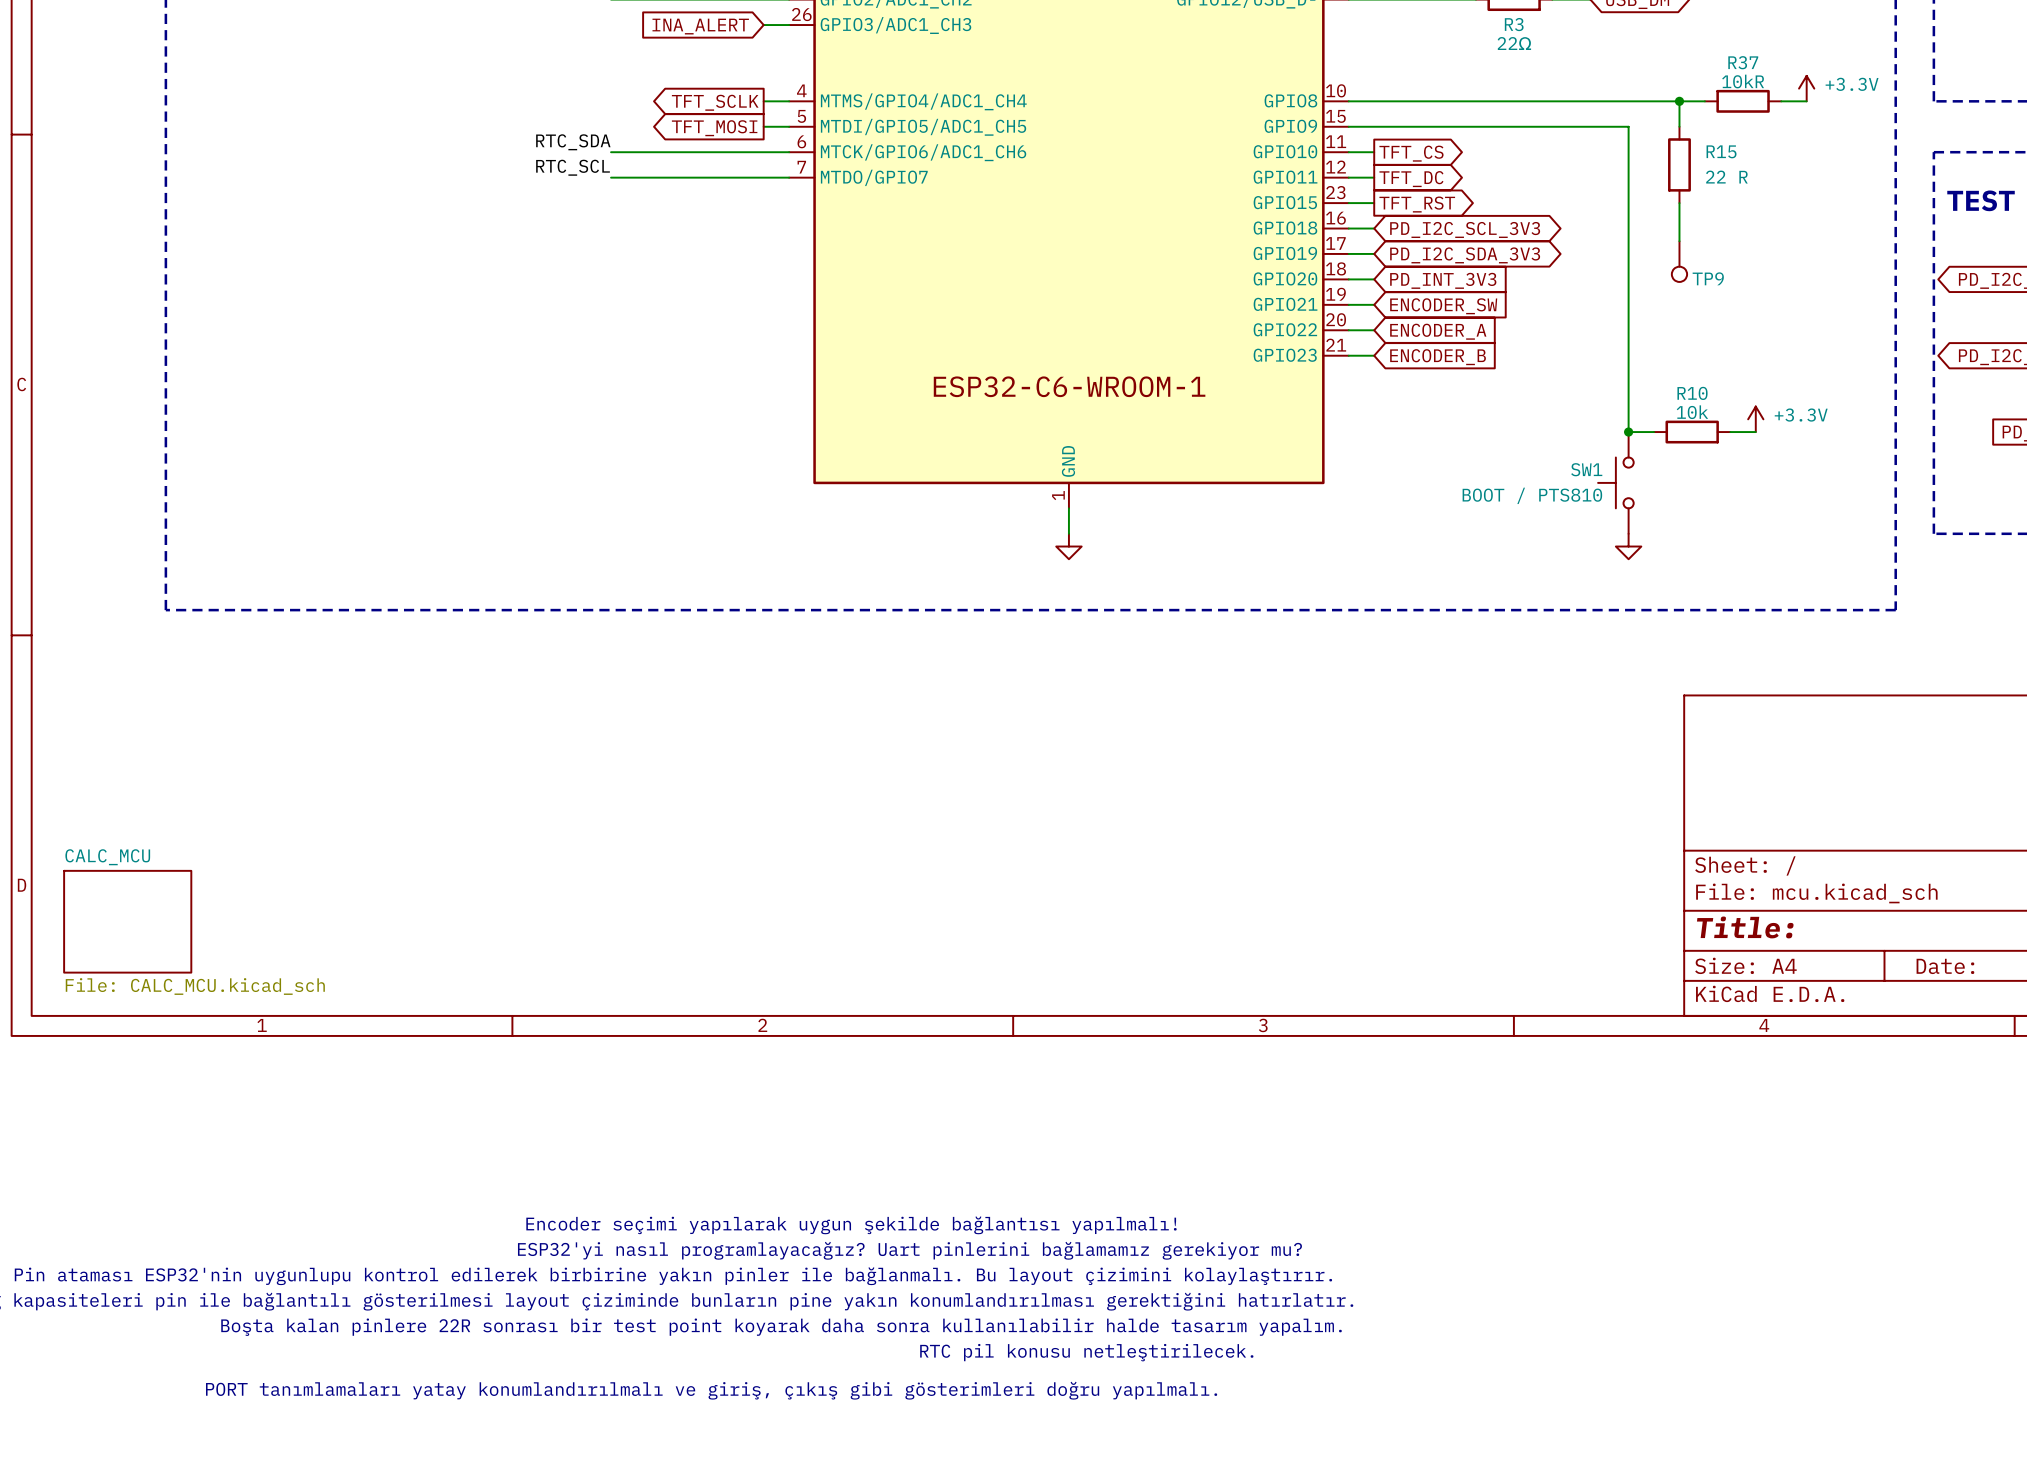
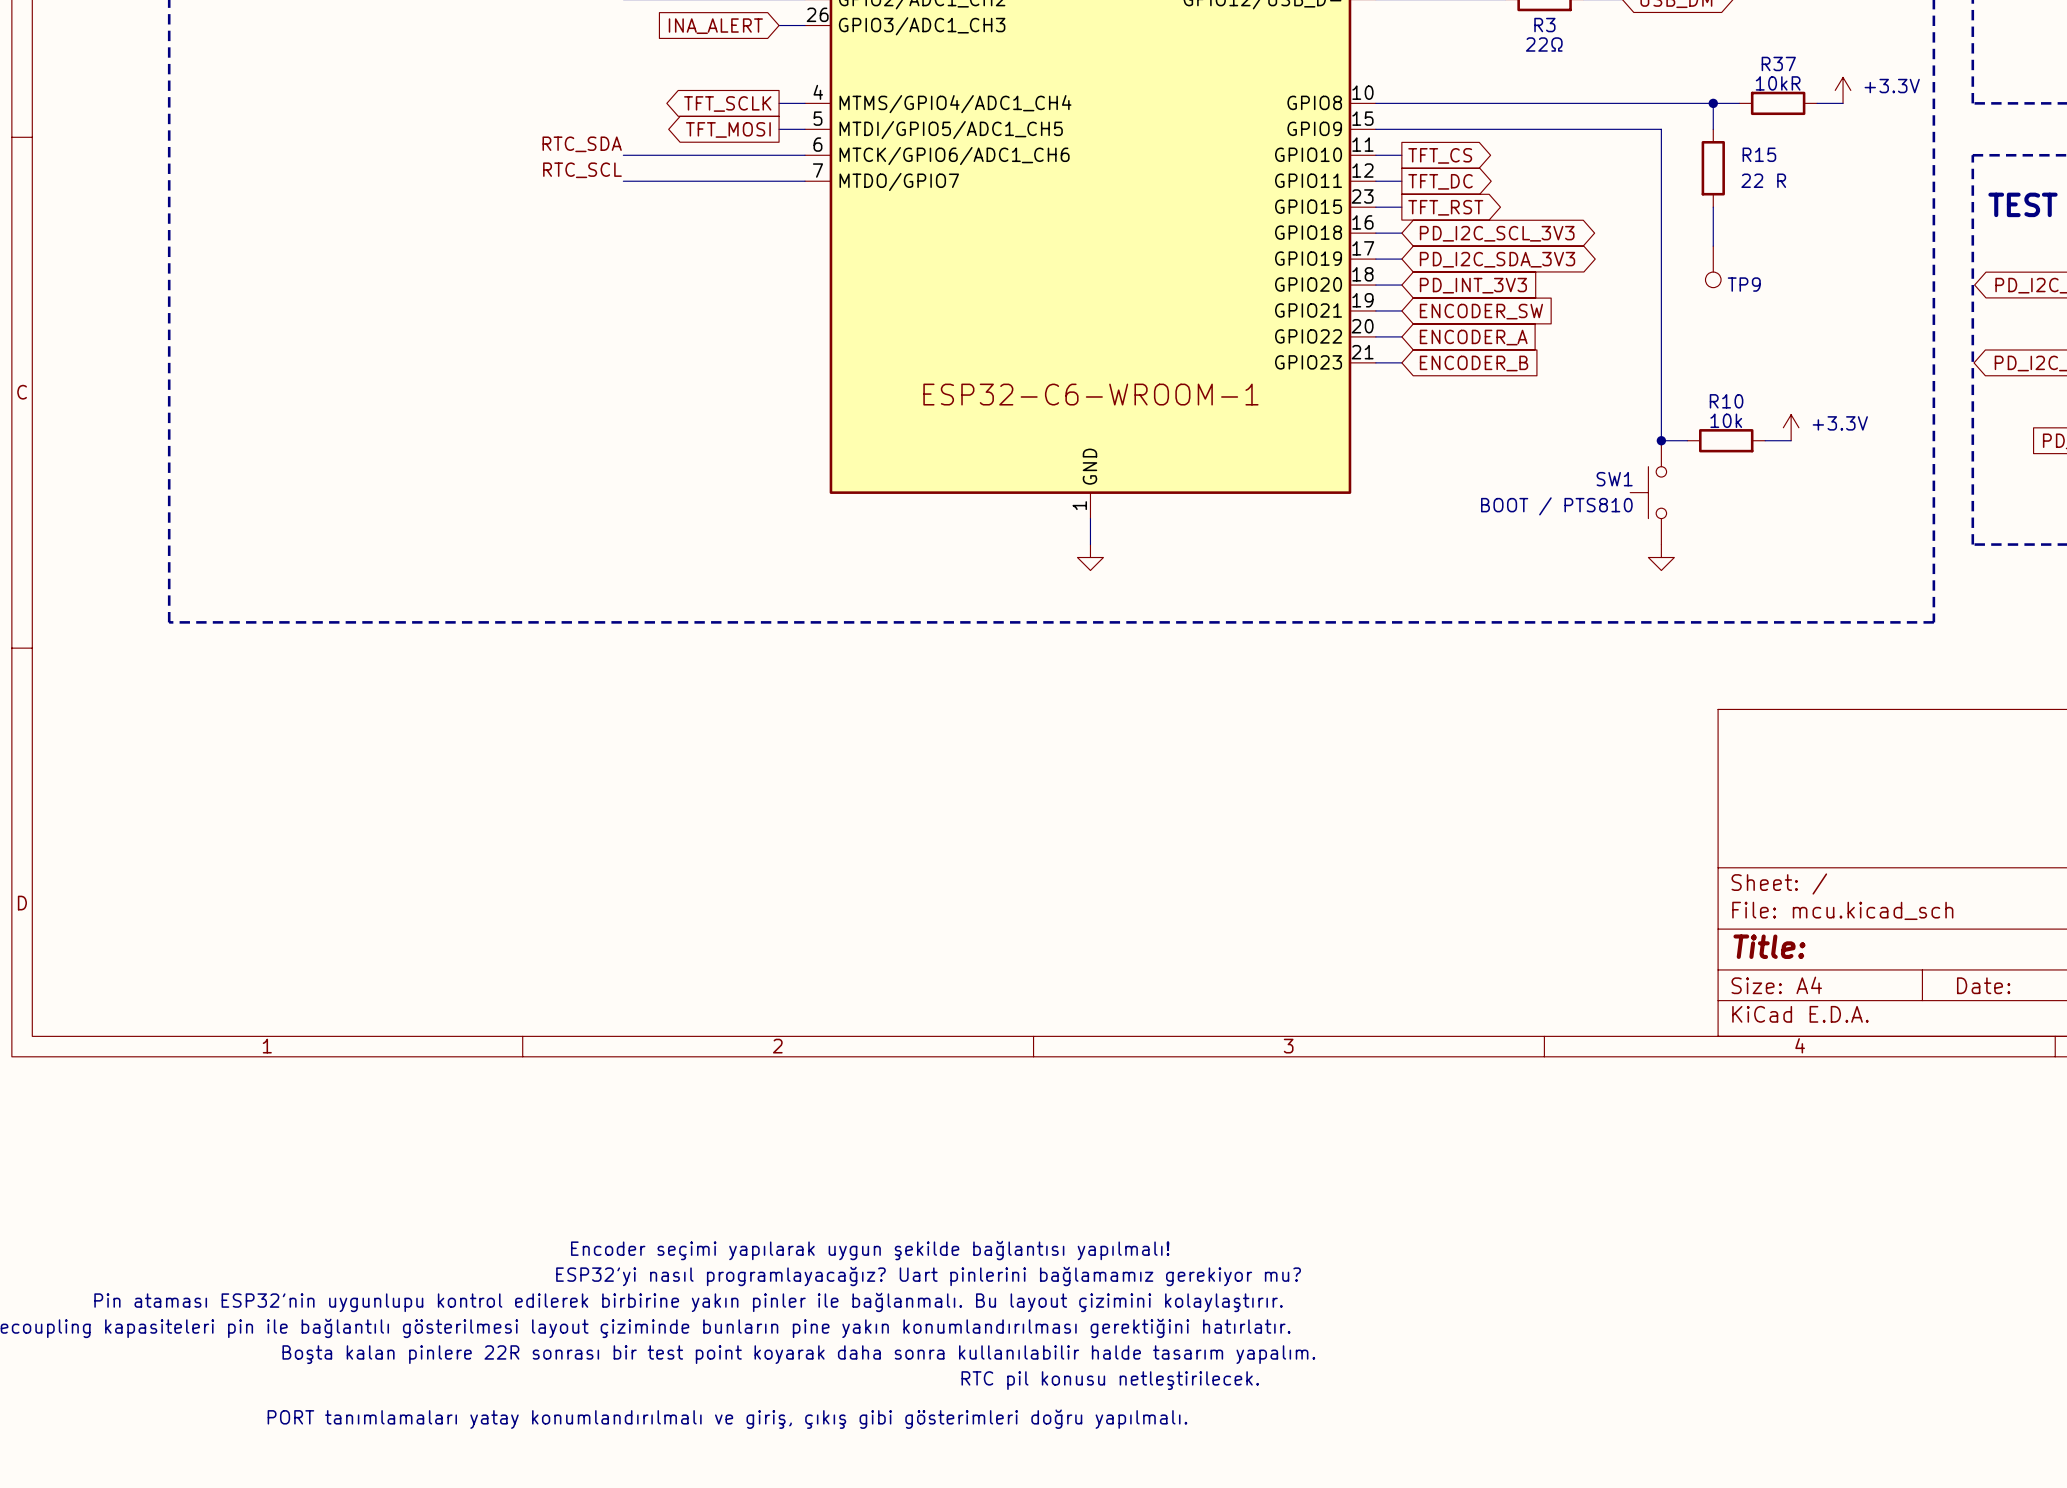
sheet CALC_MCU: File: CALC_MCU.kicad_sch (127, 921) -> none

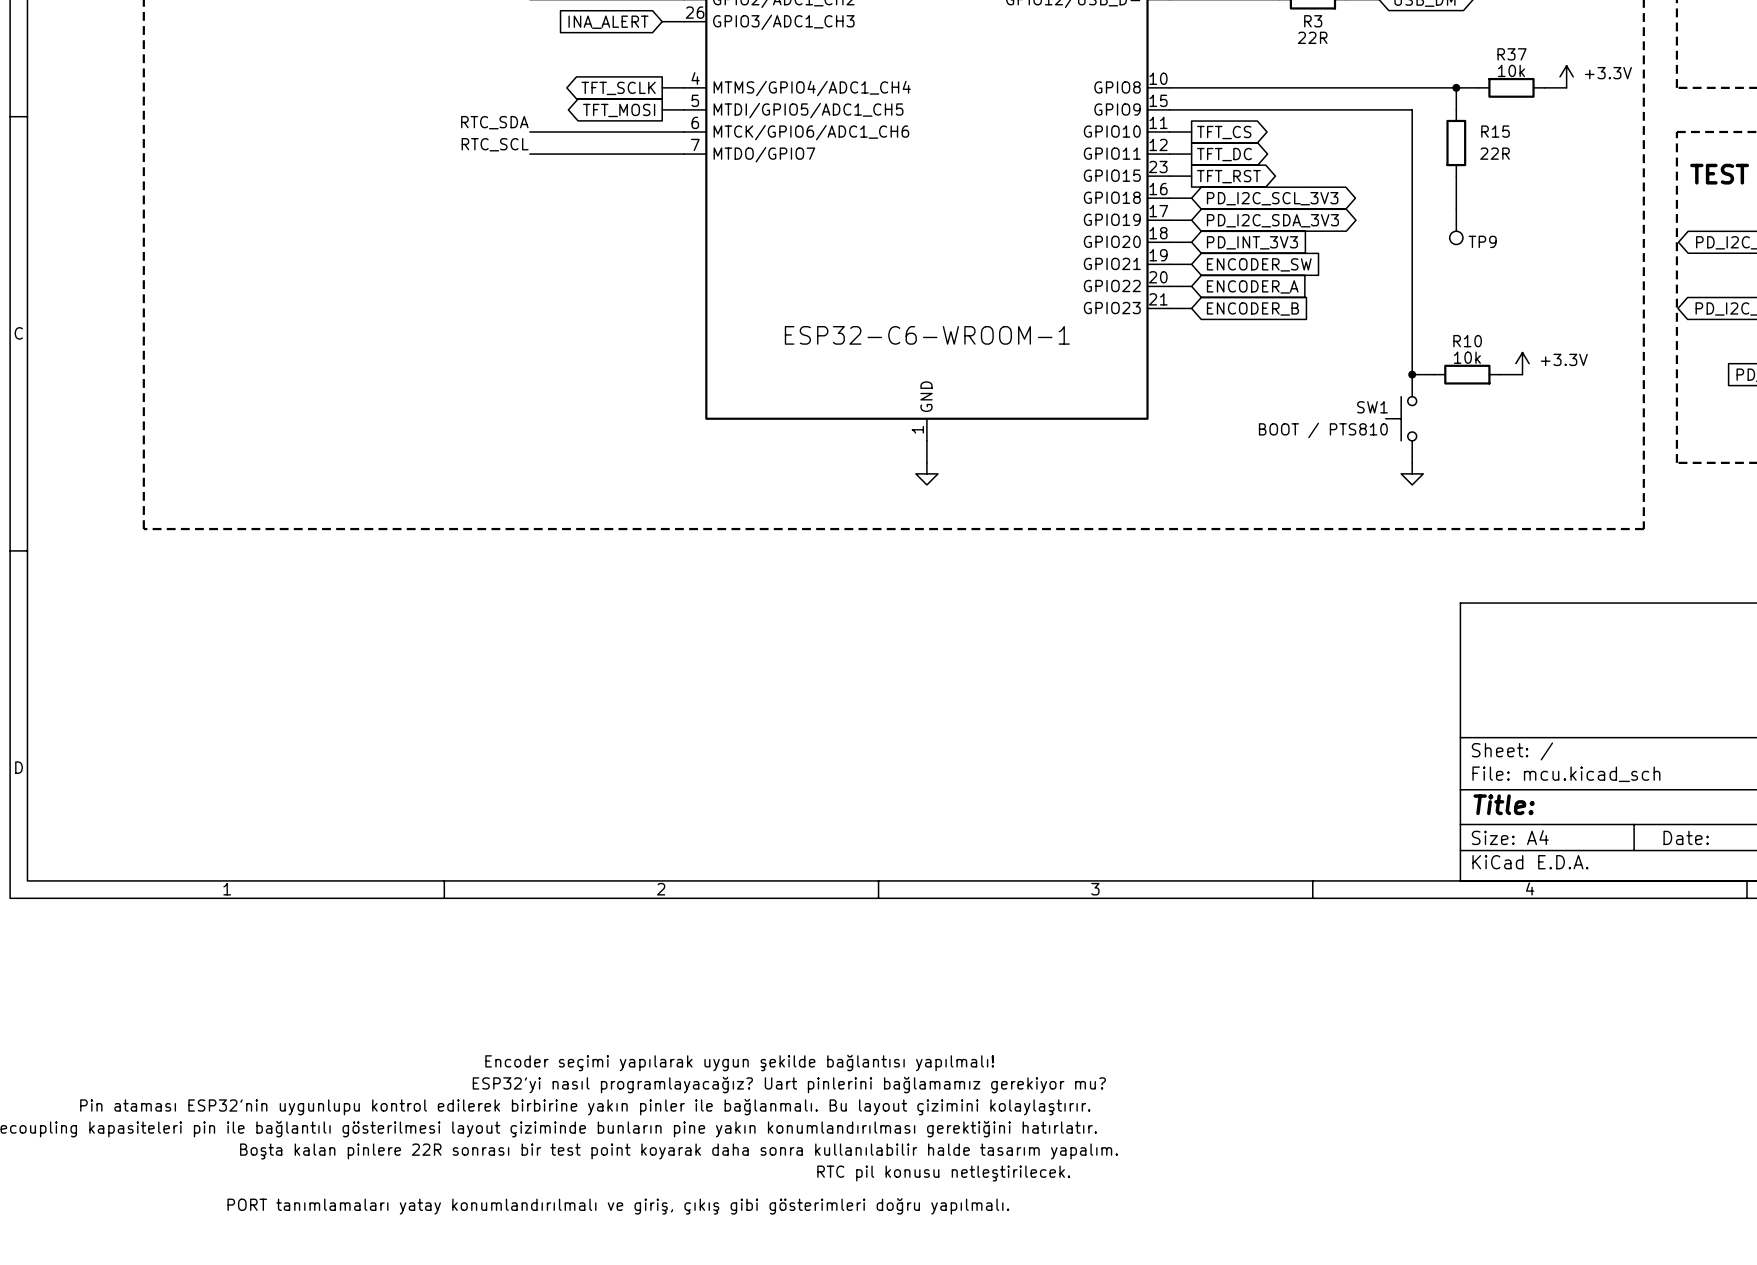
R3 value: 22Ω (1544, 44) -> 22R (1312, 37)
R37 value: 10kR (1778, 83) -> 10k (1511, 70)
R15 value: 22 R (1763, 180) -> 22R (1495, 153)

